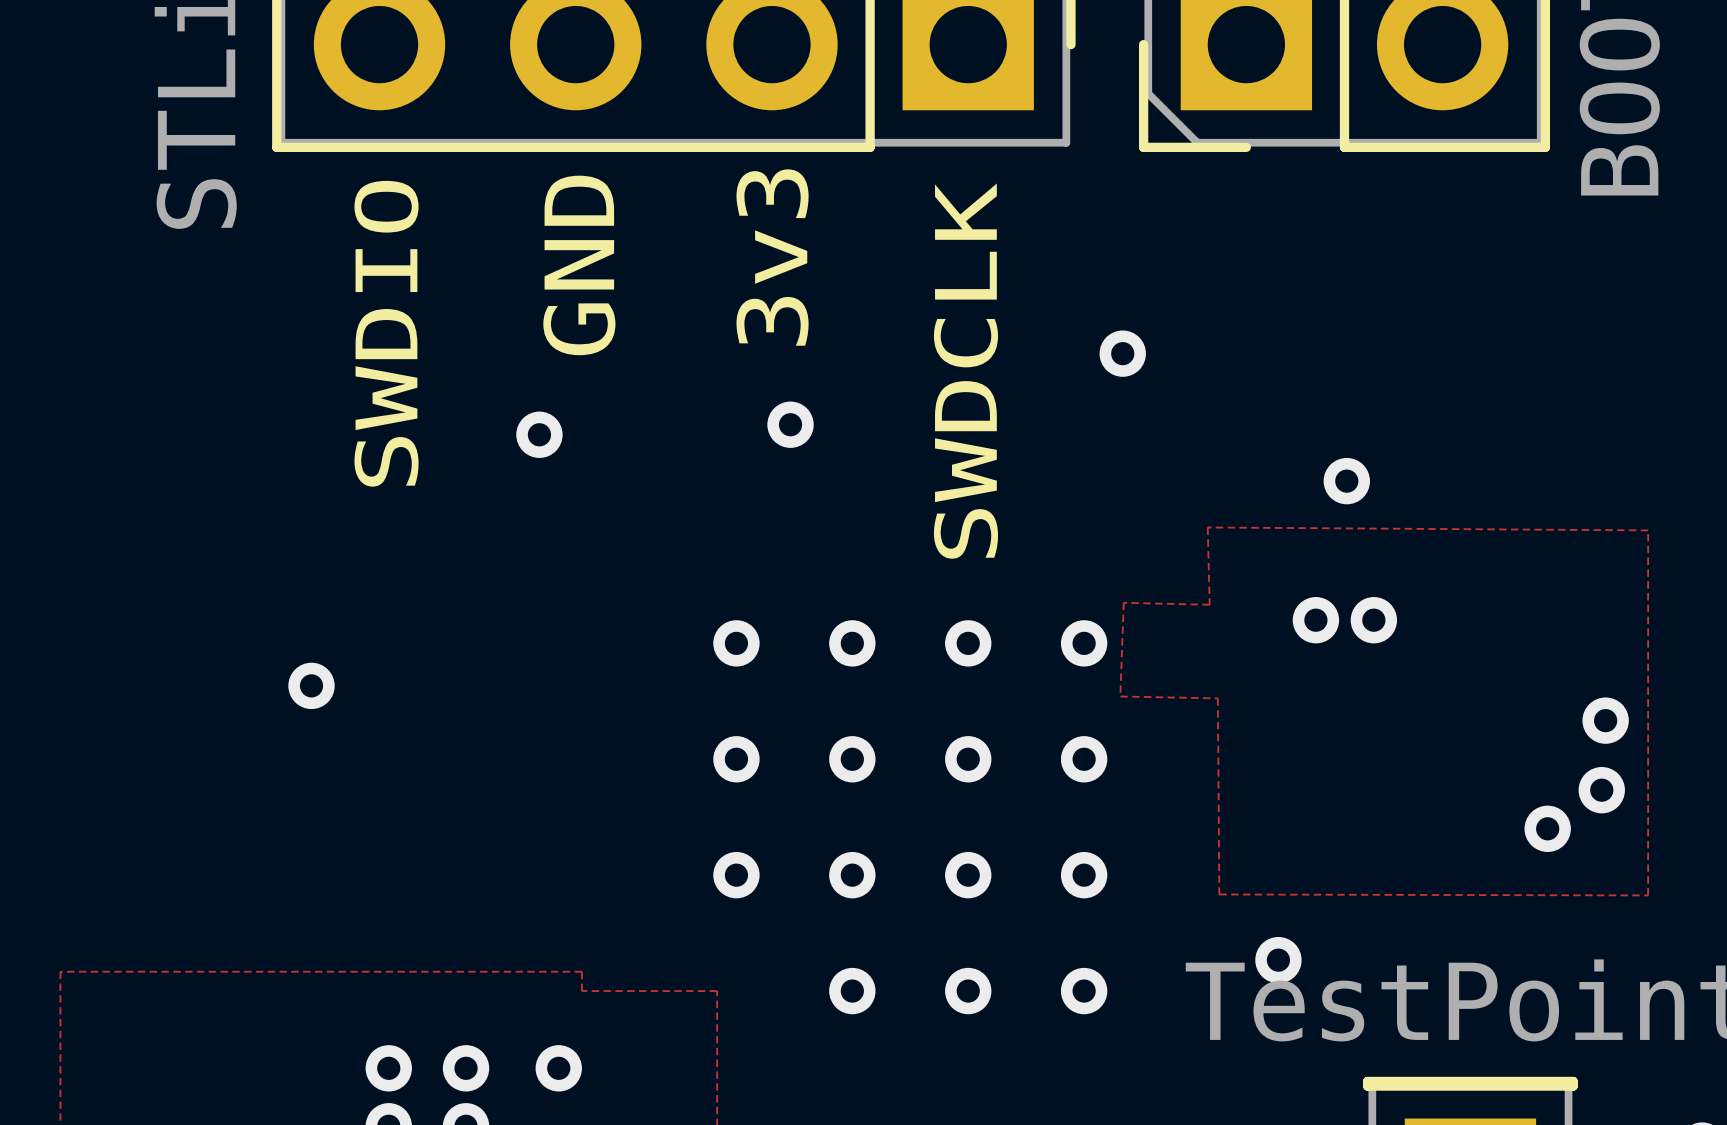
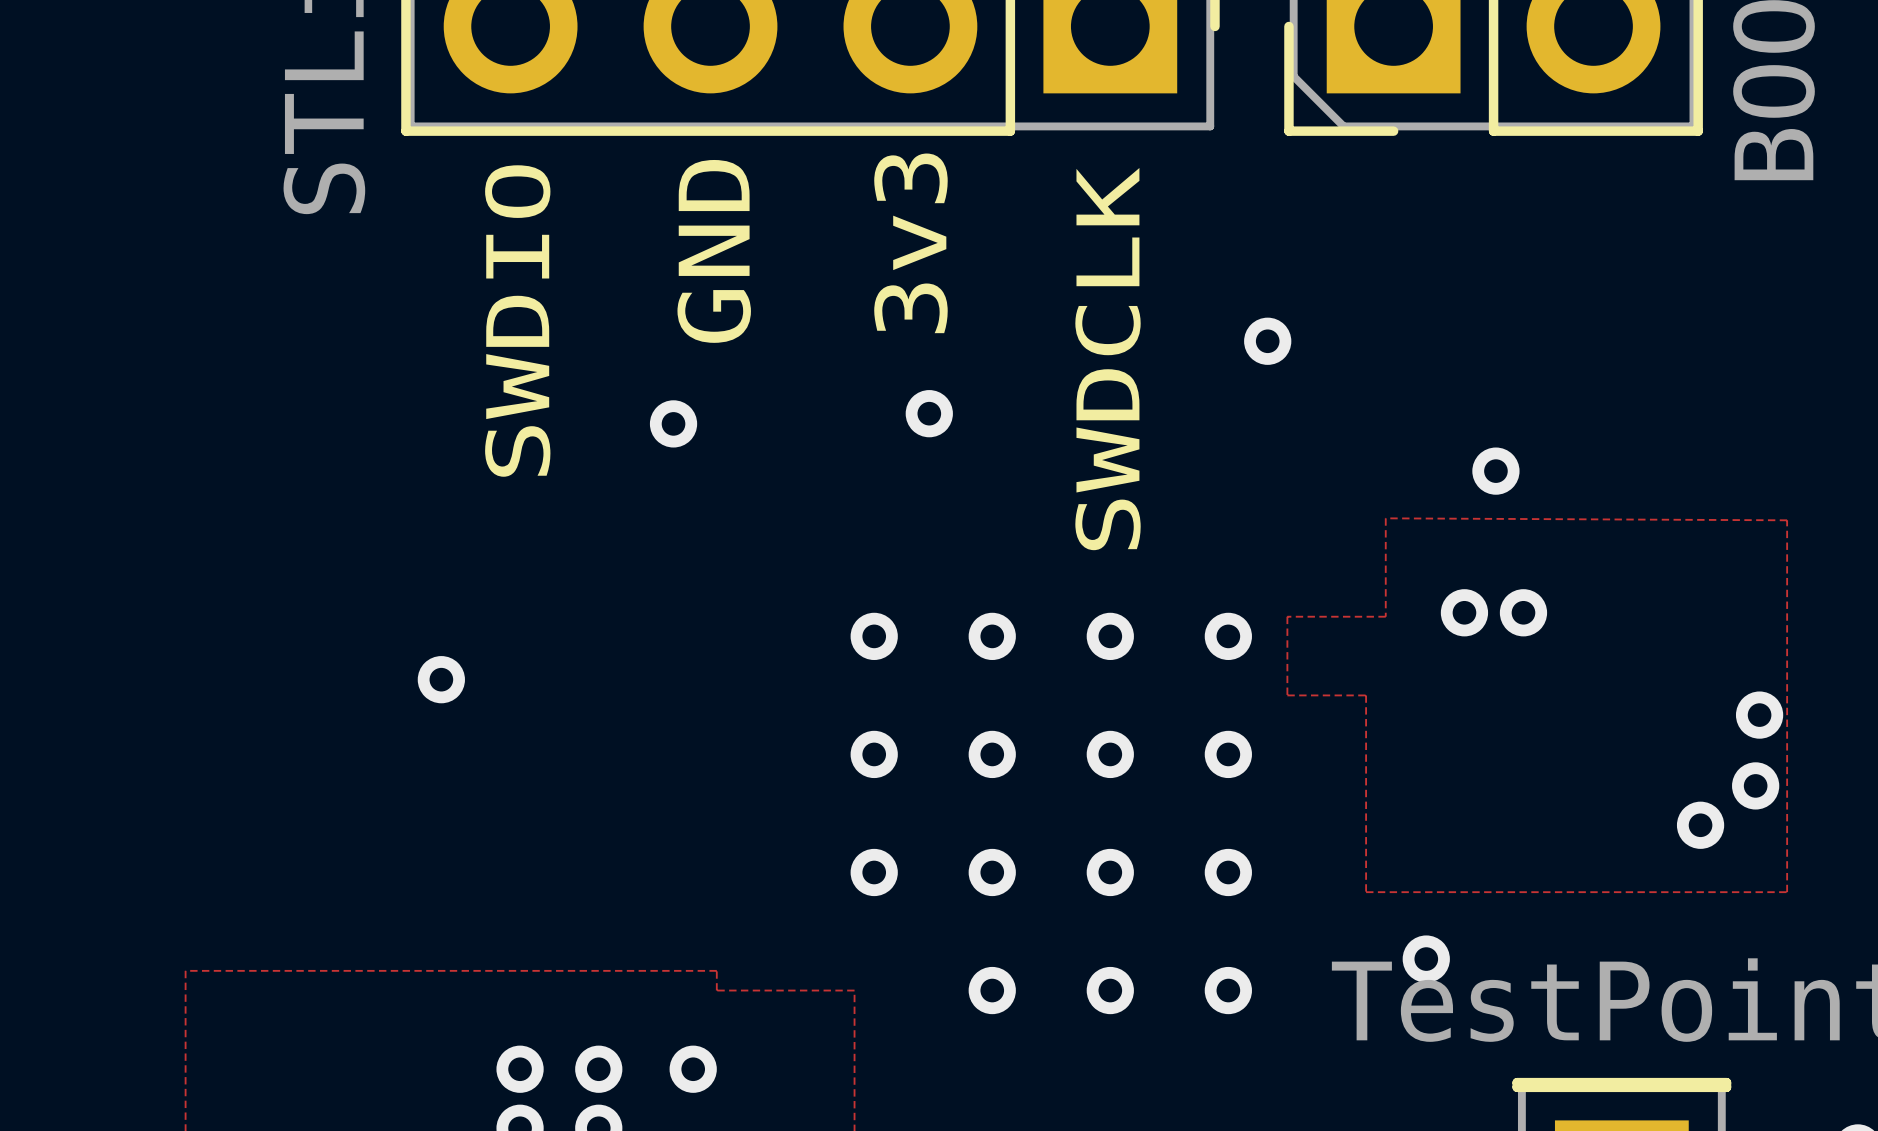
zone outline: (1207, 527) (1648, 530) (1648, 895) (1219, 894) (1217, 698) (1120, 696) (1123, 602) (1209, 604) (1207, 527) -> (1385, 518) (1385, 616) (1287, 616) (1287, 695) (1366, 695) (1366, 892) (1787, 892) (1787, 520) (1385, 518)

